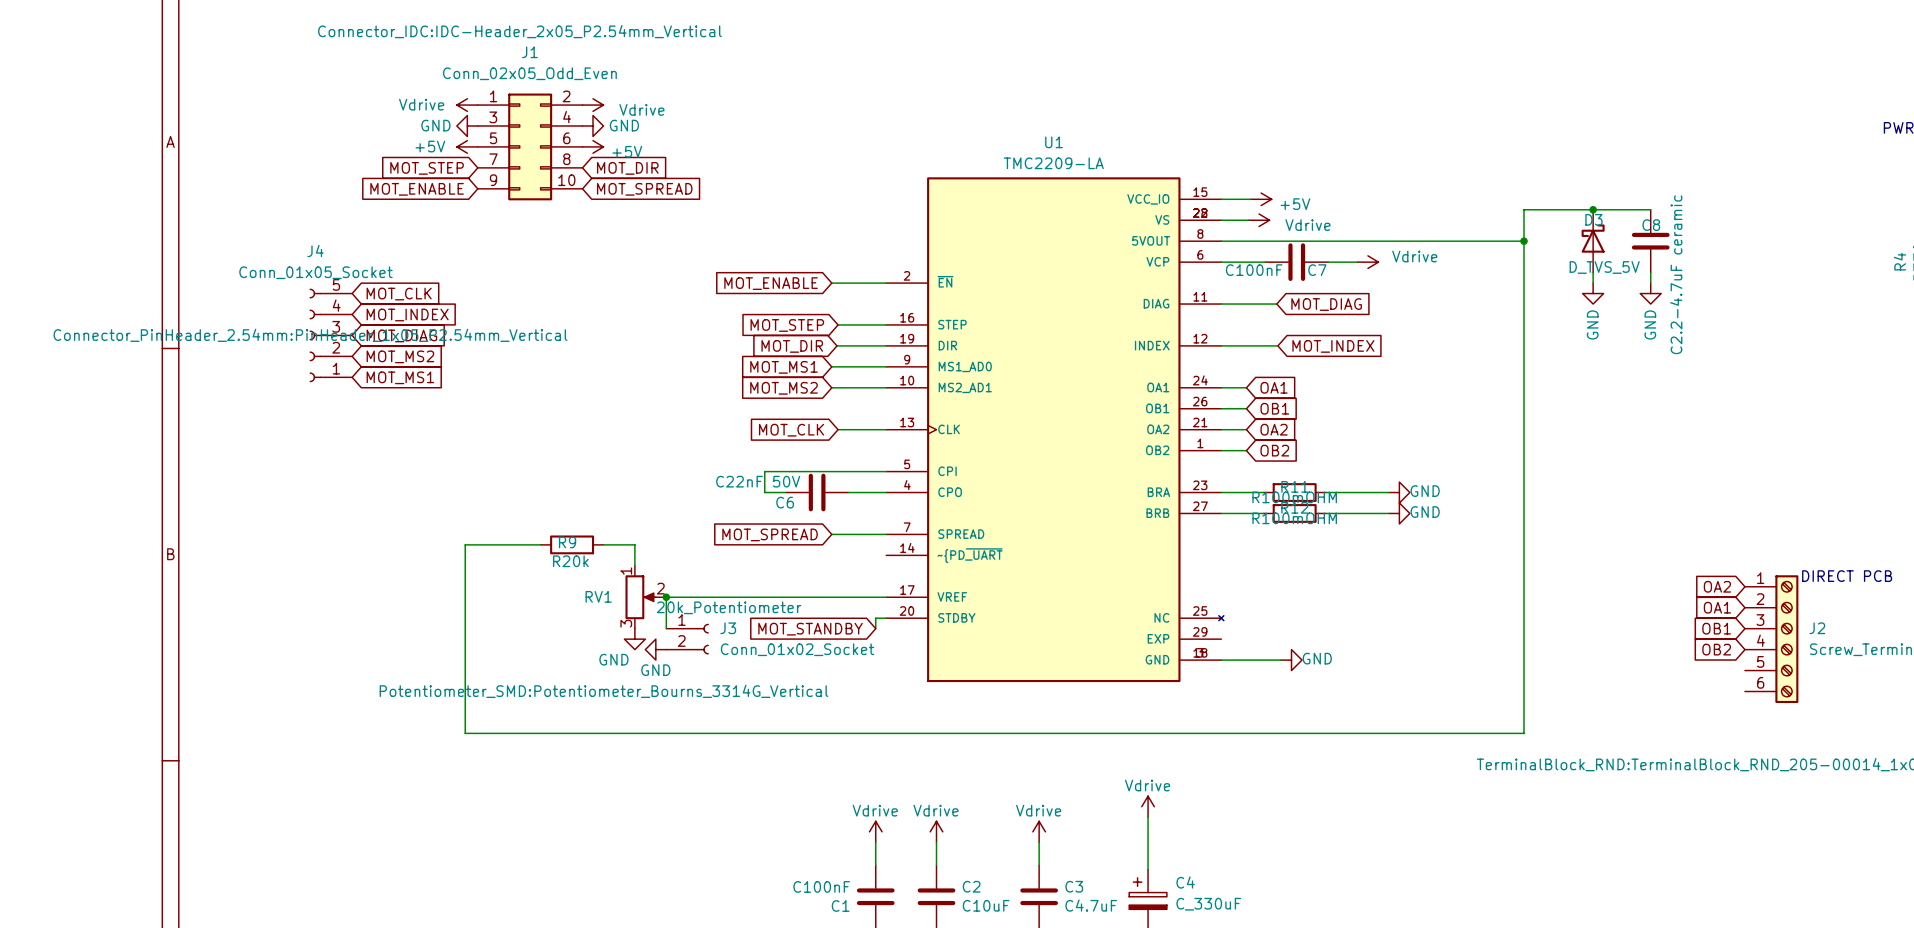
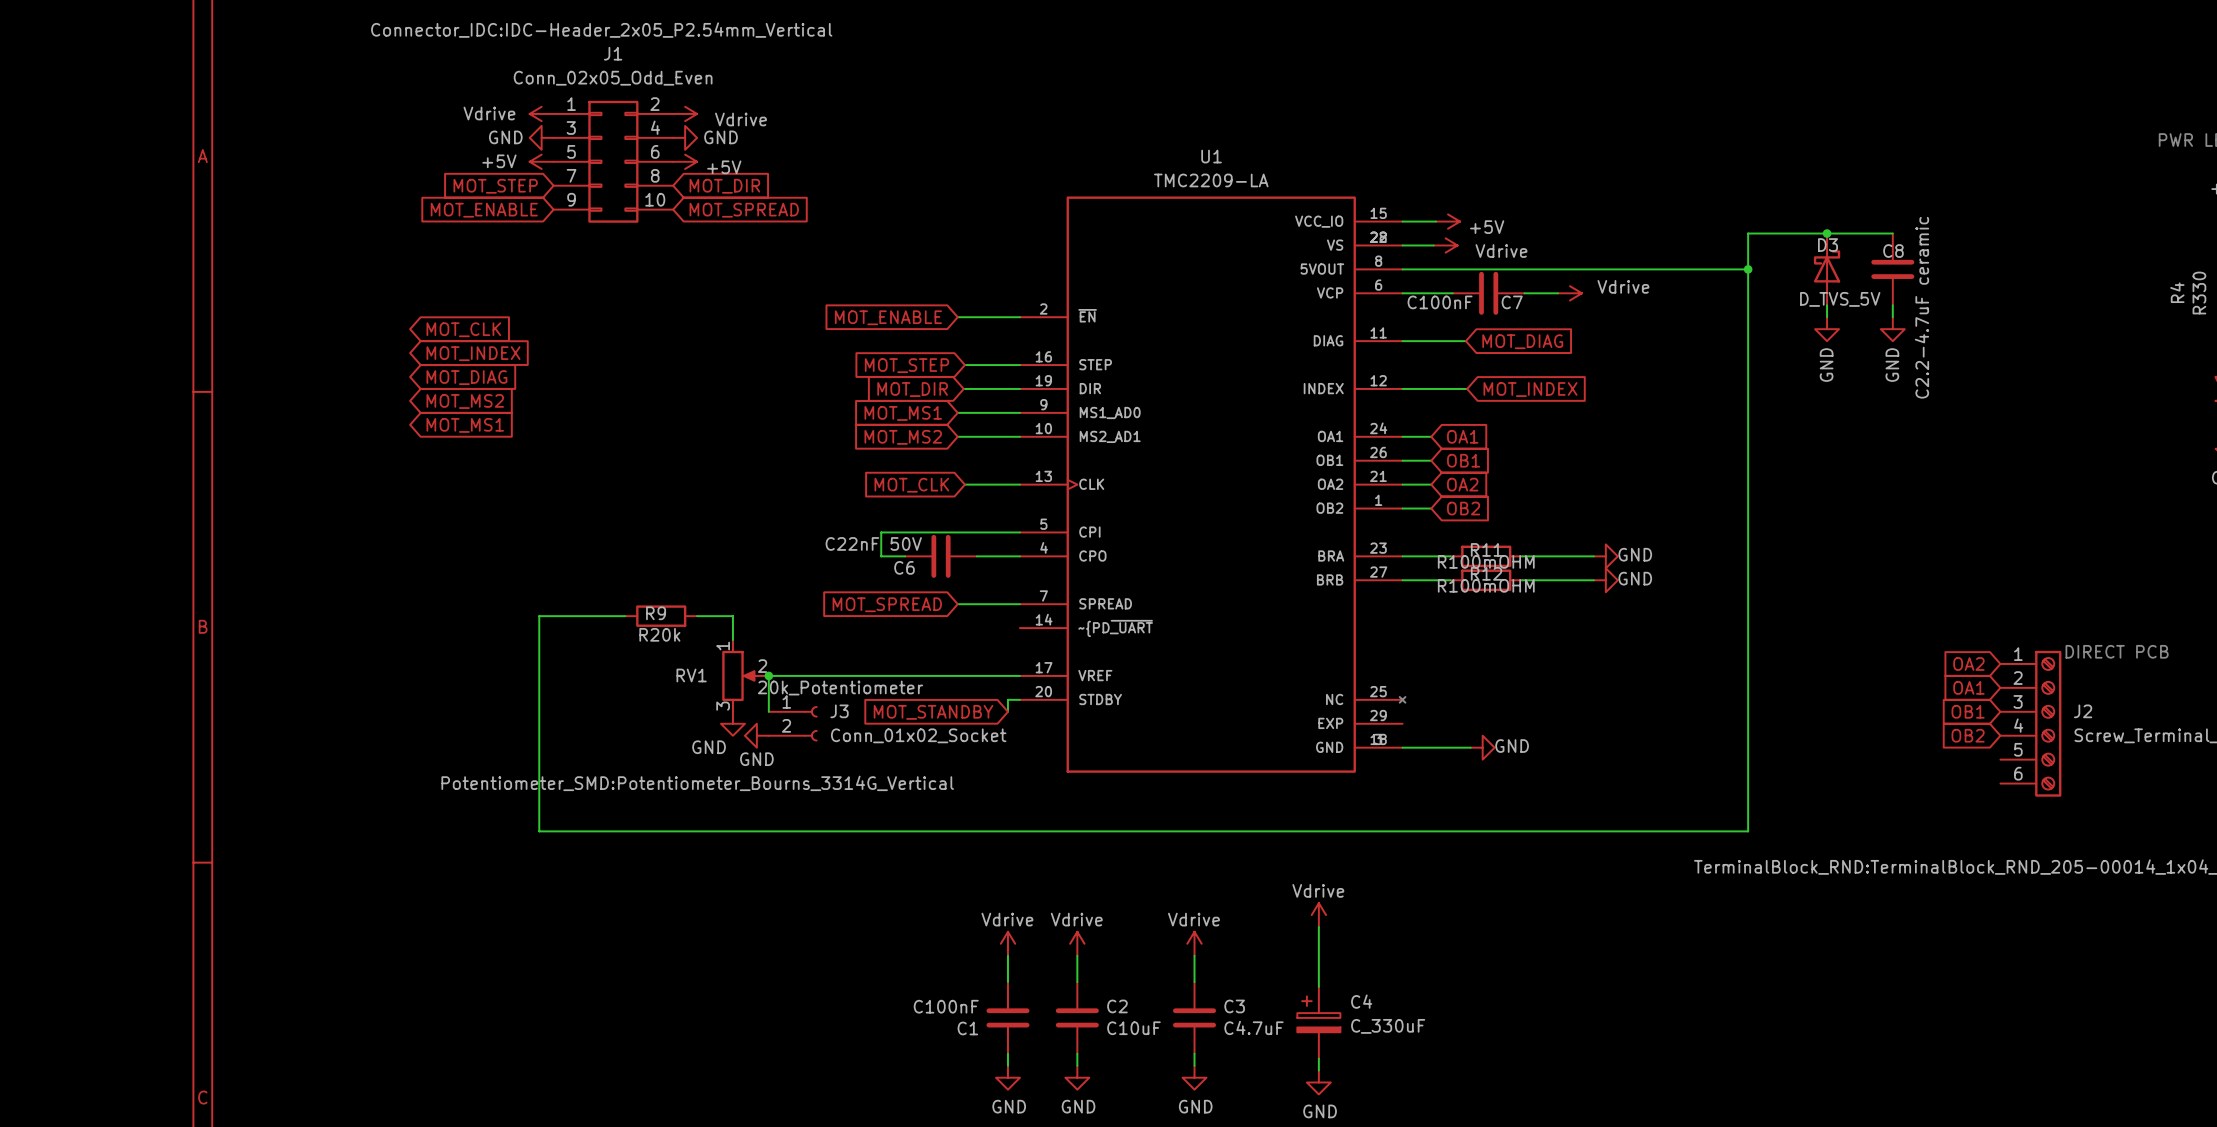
J4: Conn_01x05_Socket (330, 335) -> none

